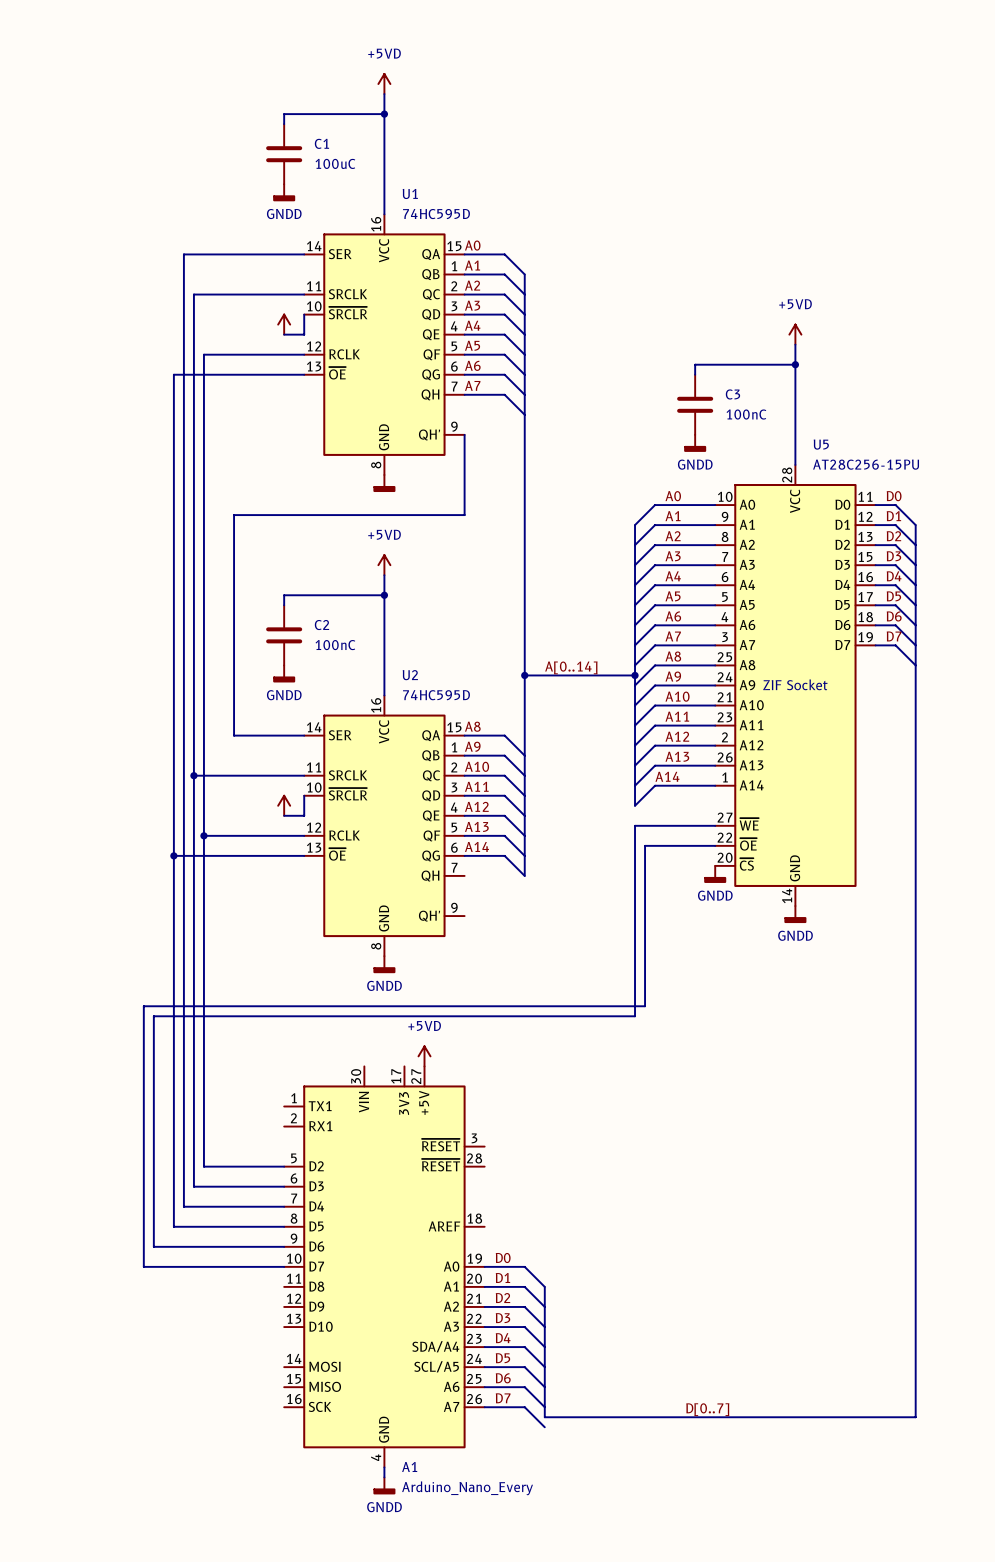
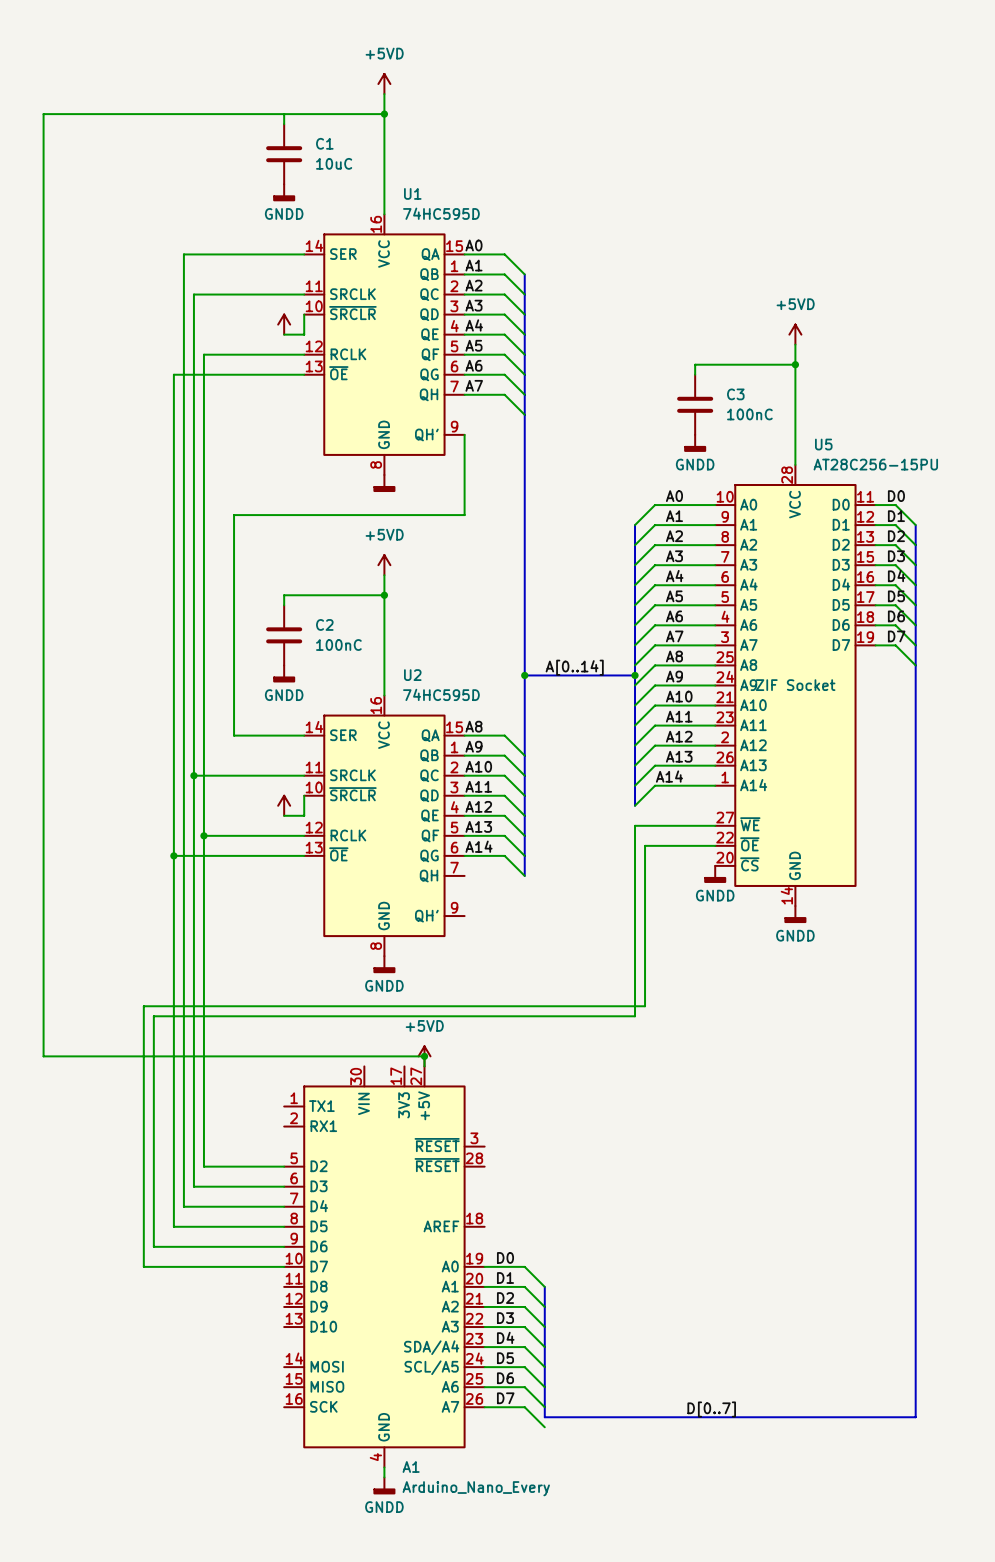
wire: none -> (284, 114) (43, 114) (43, 1056) (424, 1056) (424, 1066)
C1 value: 100uC (335, 163) -> 10uC (334, 163)
junction: none -> (424, 1056)

